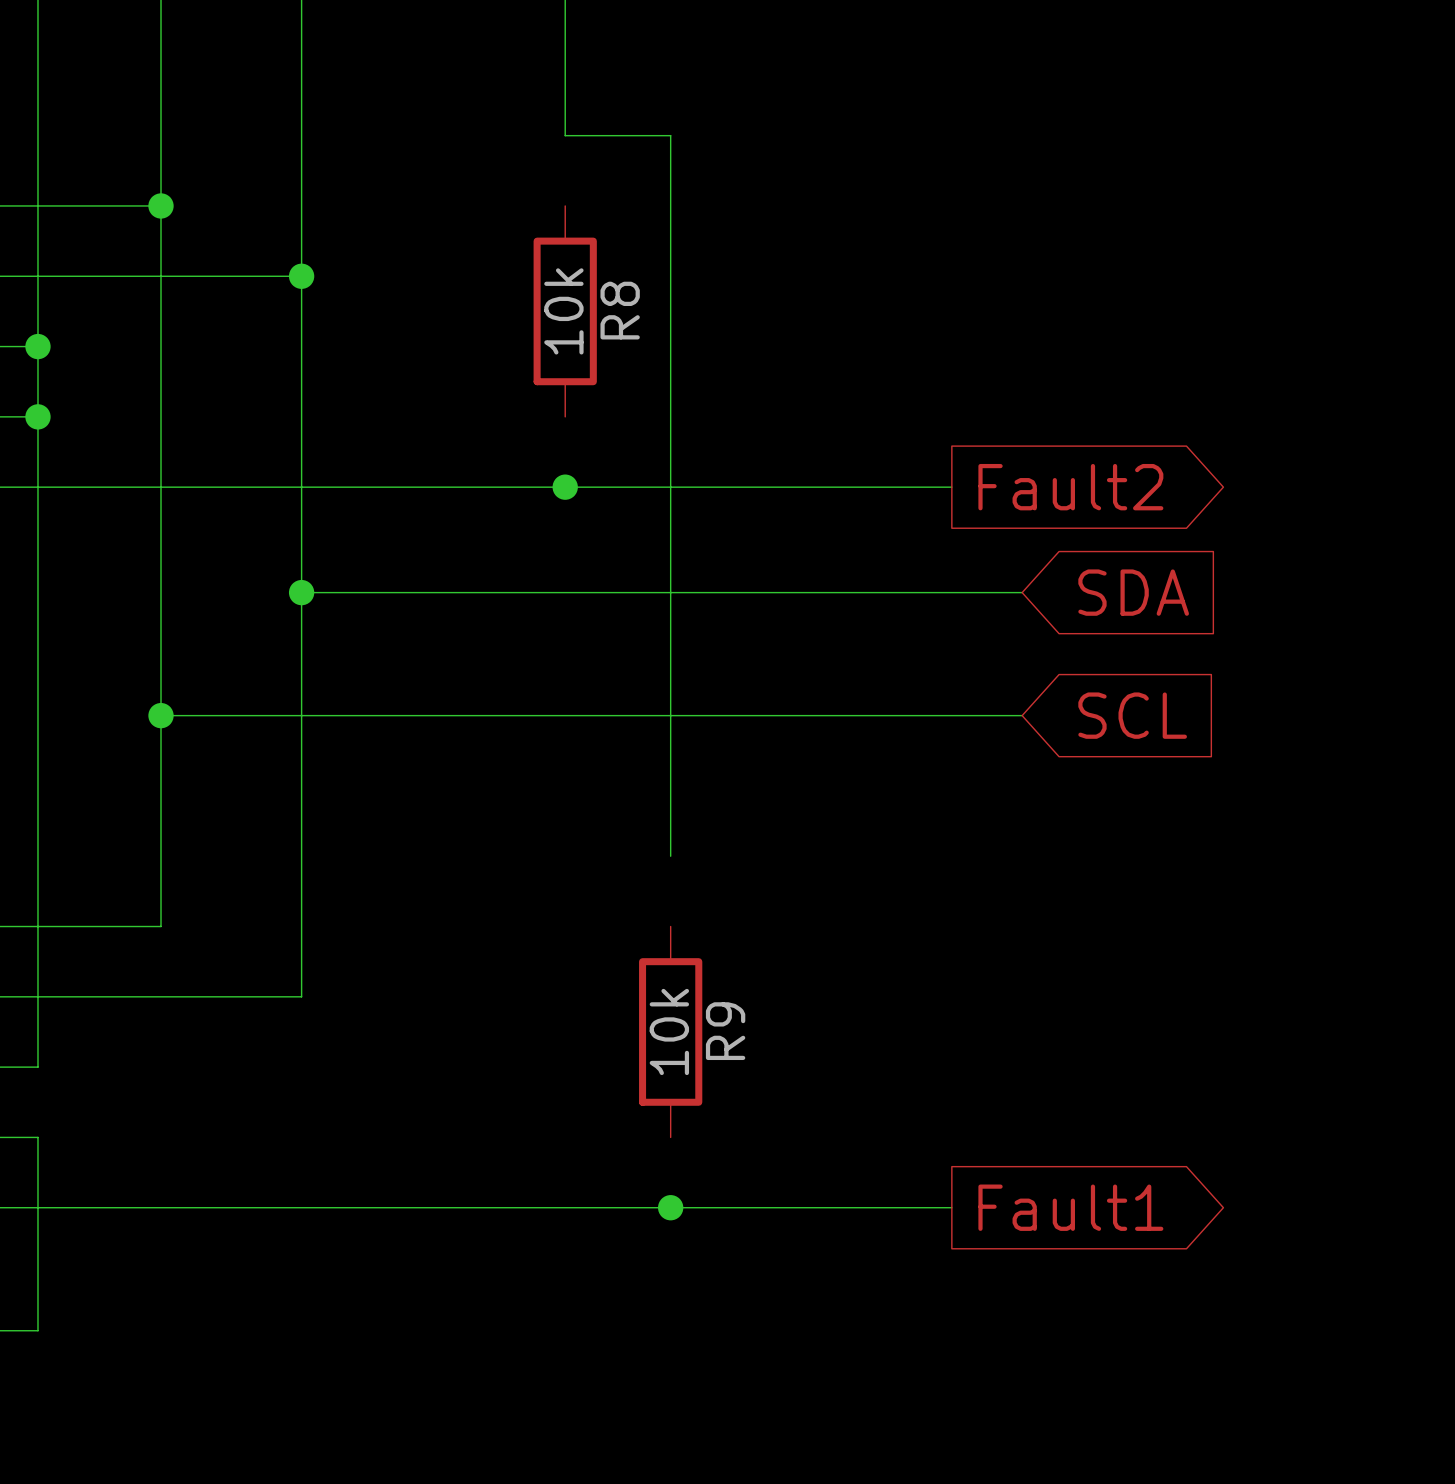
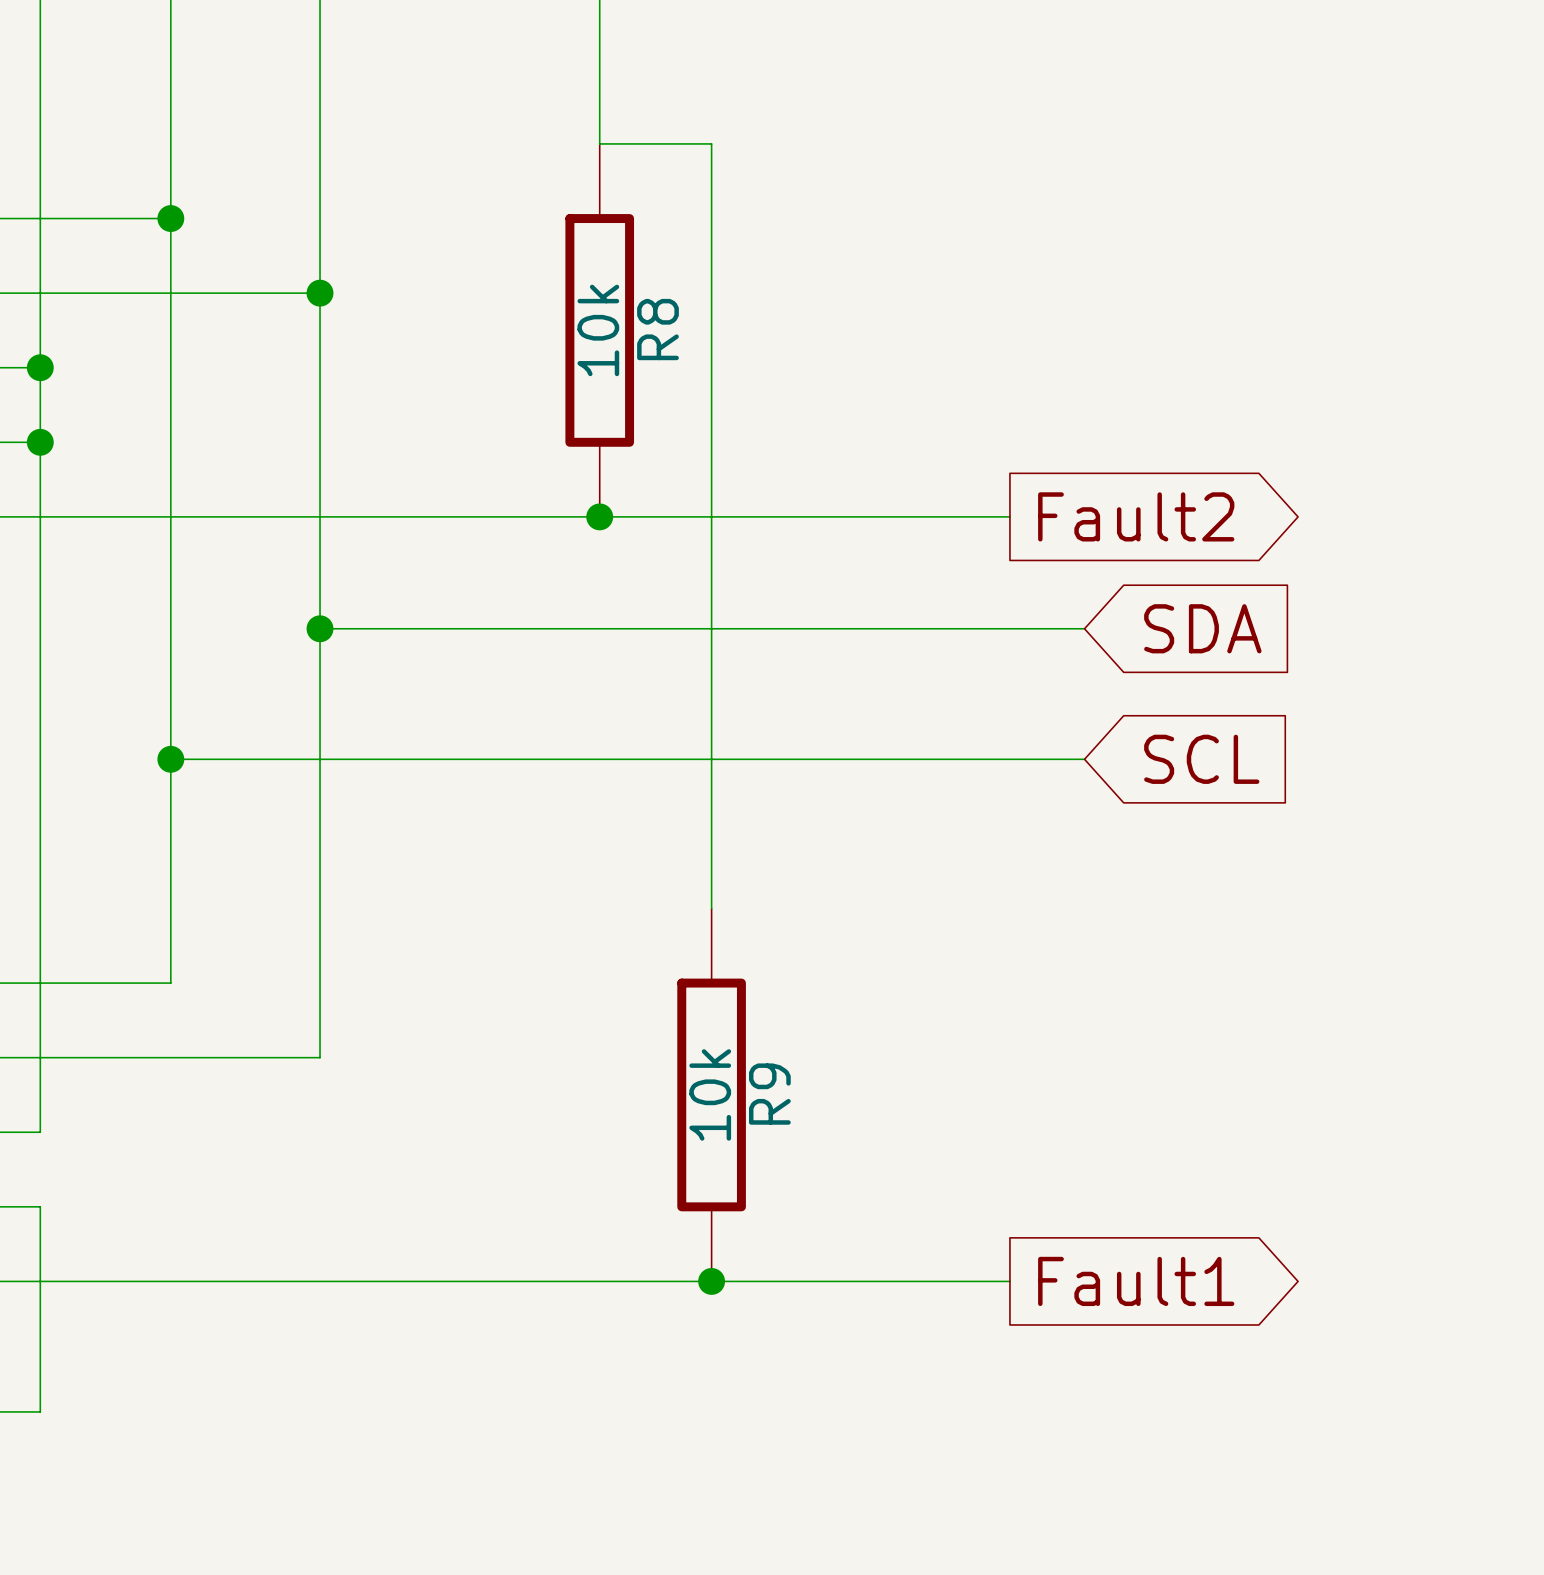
R8 symbol: [533, 205, 597, 417] -> [565, 143, 635, 517]
R9 symbol: [639, 926, 703, 1138] -> [677, 908, 746, 1282]

